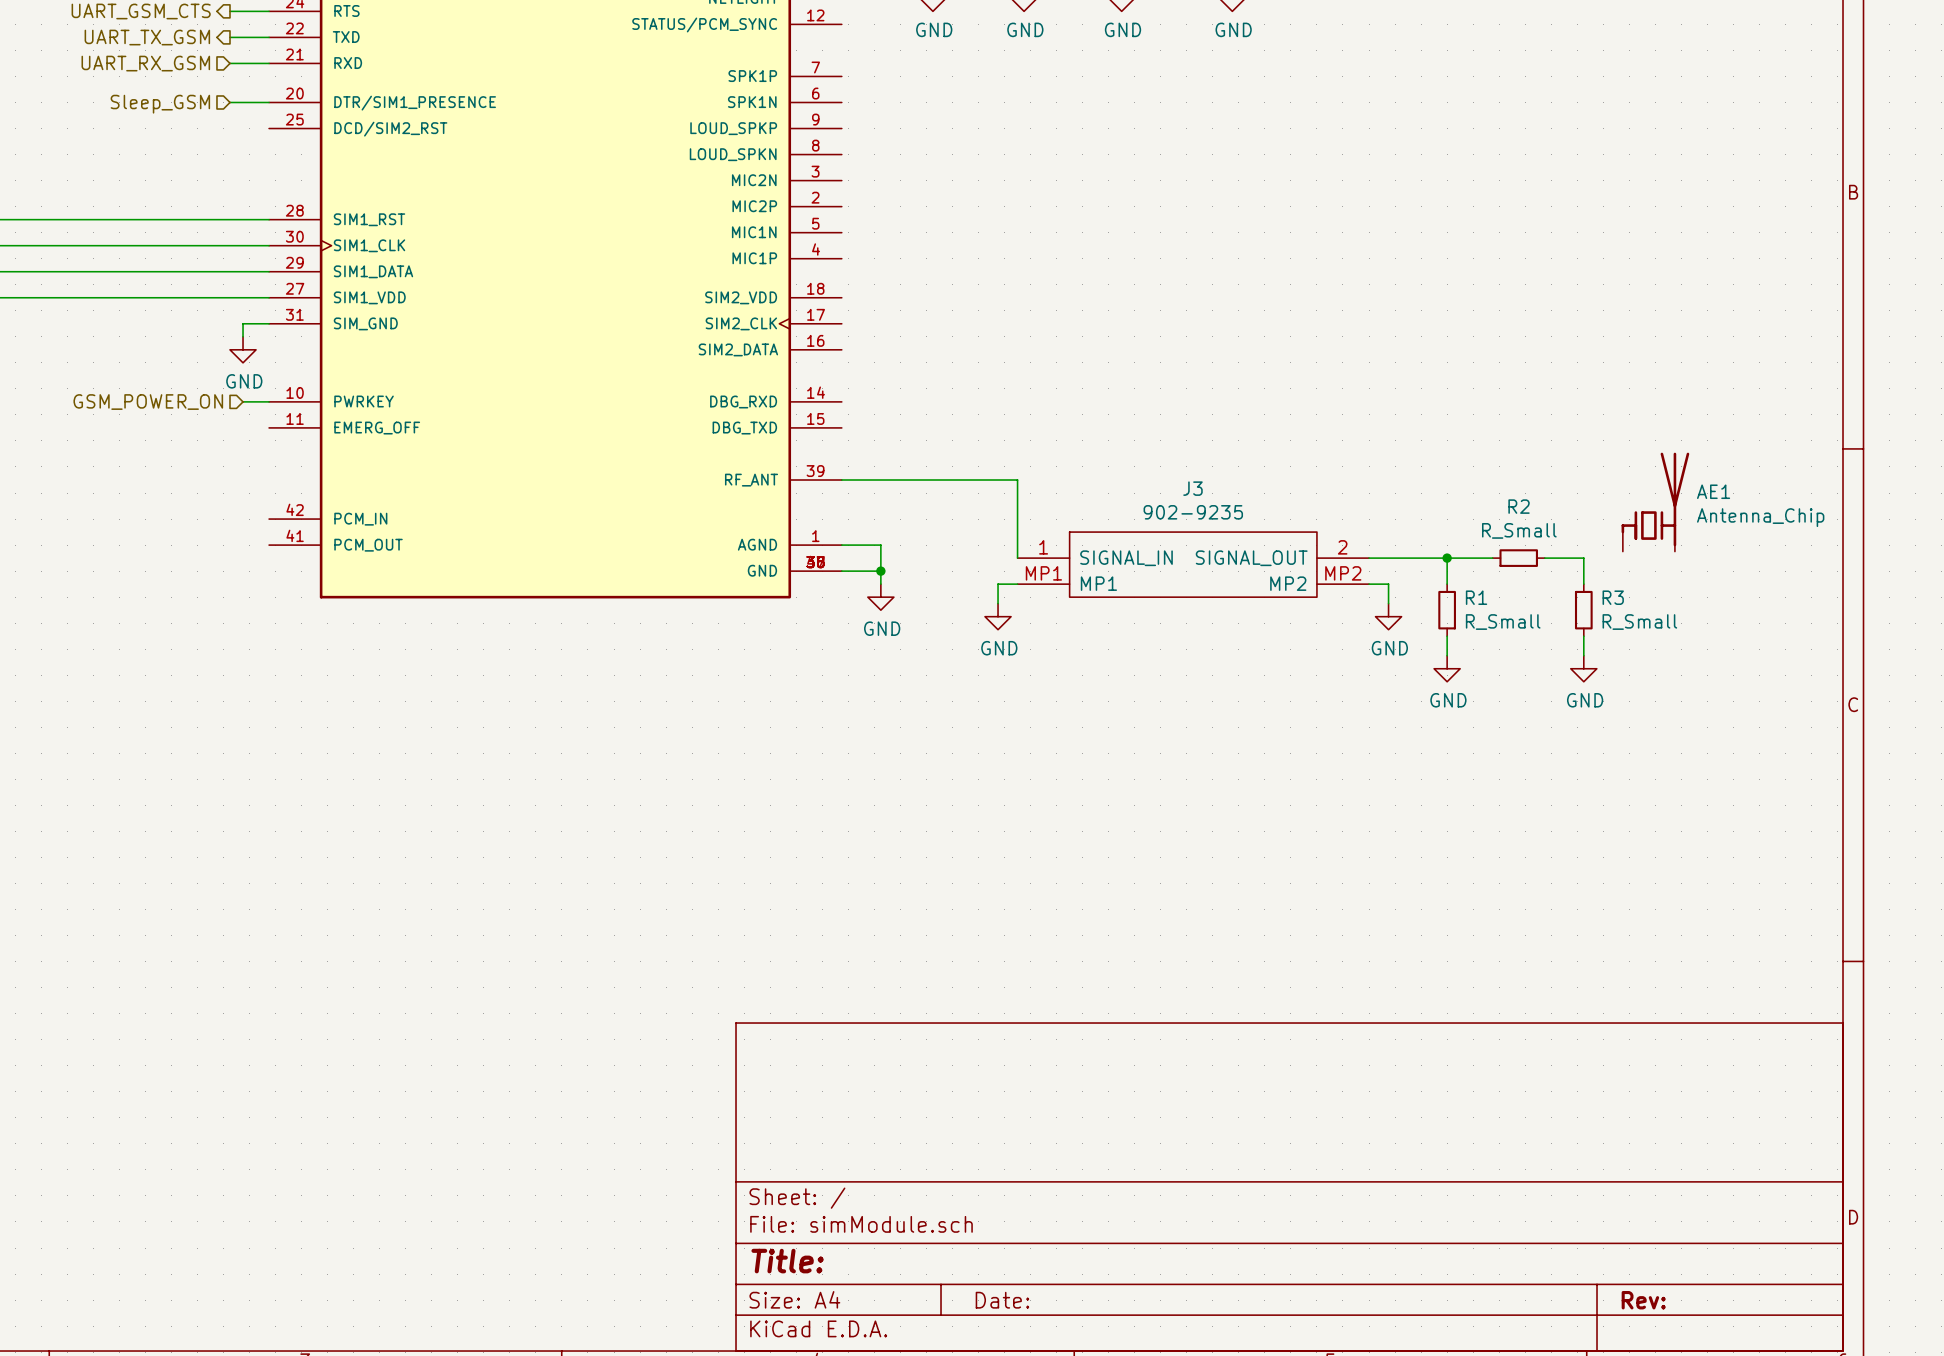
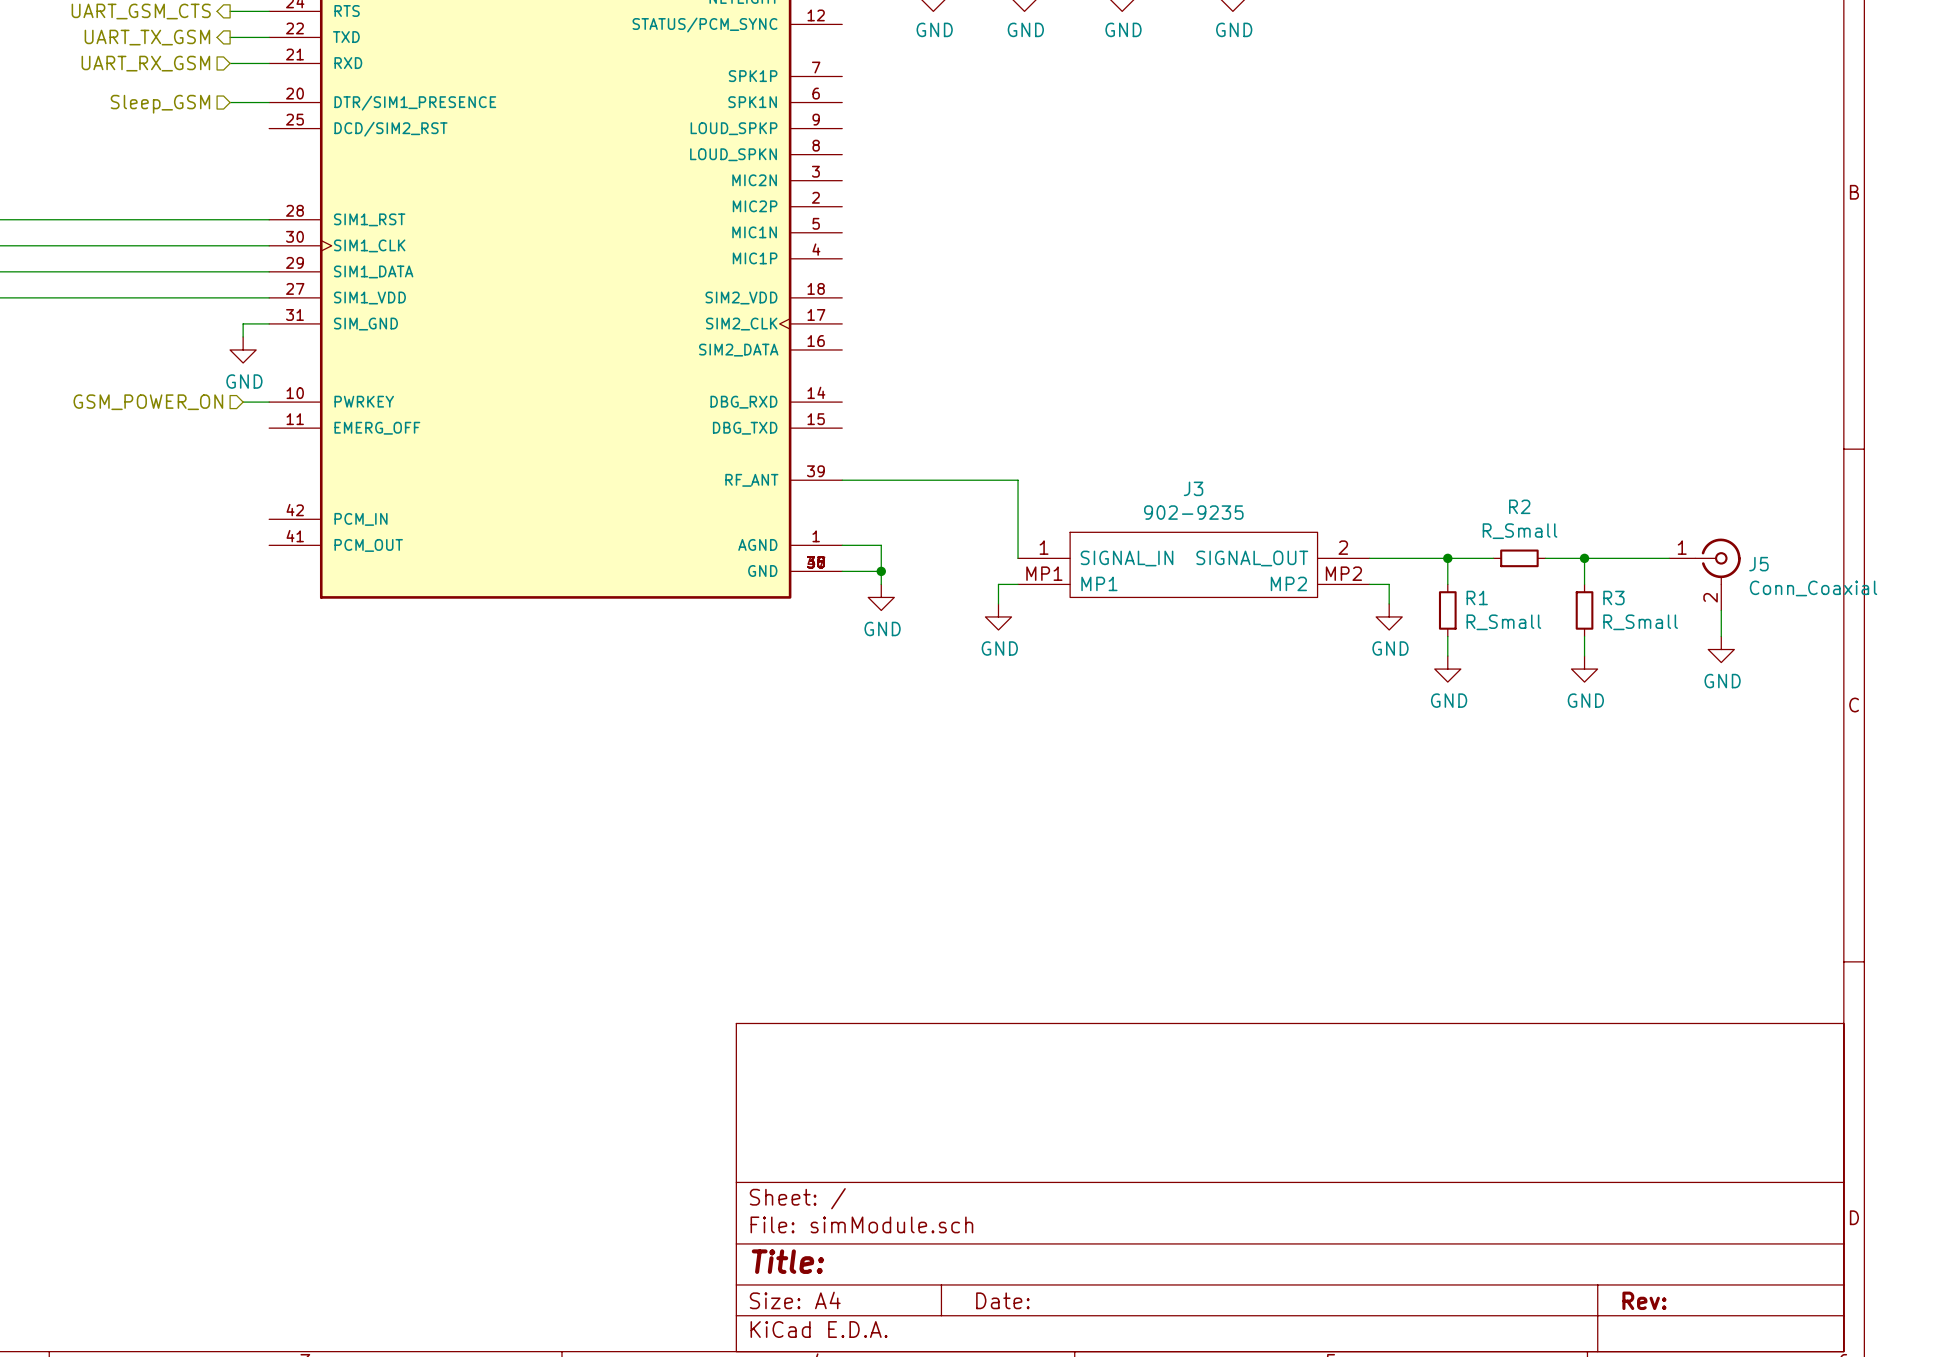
AE1: Antenna_Chip (1655, 502) -> none
wire: none -> (1584, 558) (1669, 558)
junction: none -> (1584, 558)
J5: none -> Conn_Coaxial (1705, 574)
wire: none -> (1721, 610) (1721, 636)
power symbol: none -> GND (1721, 649)

